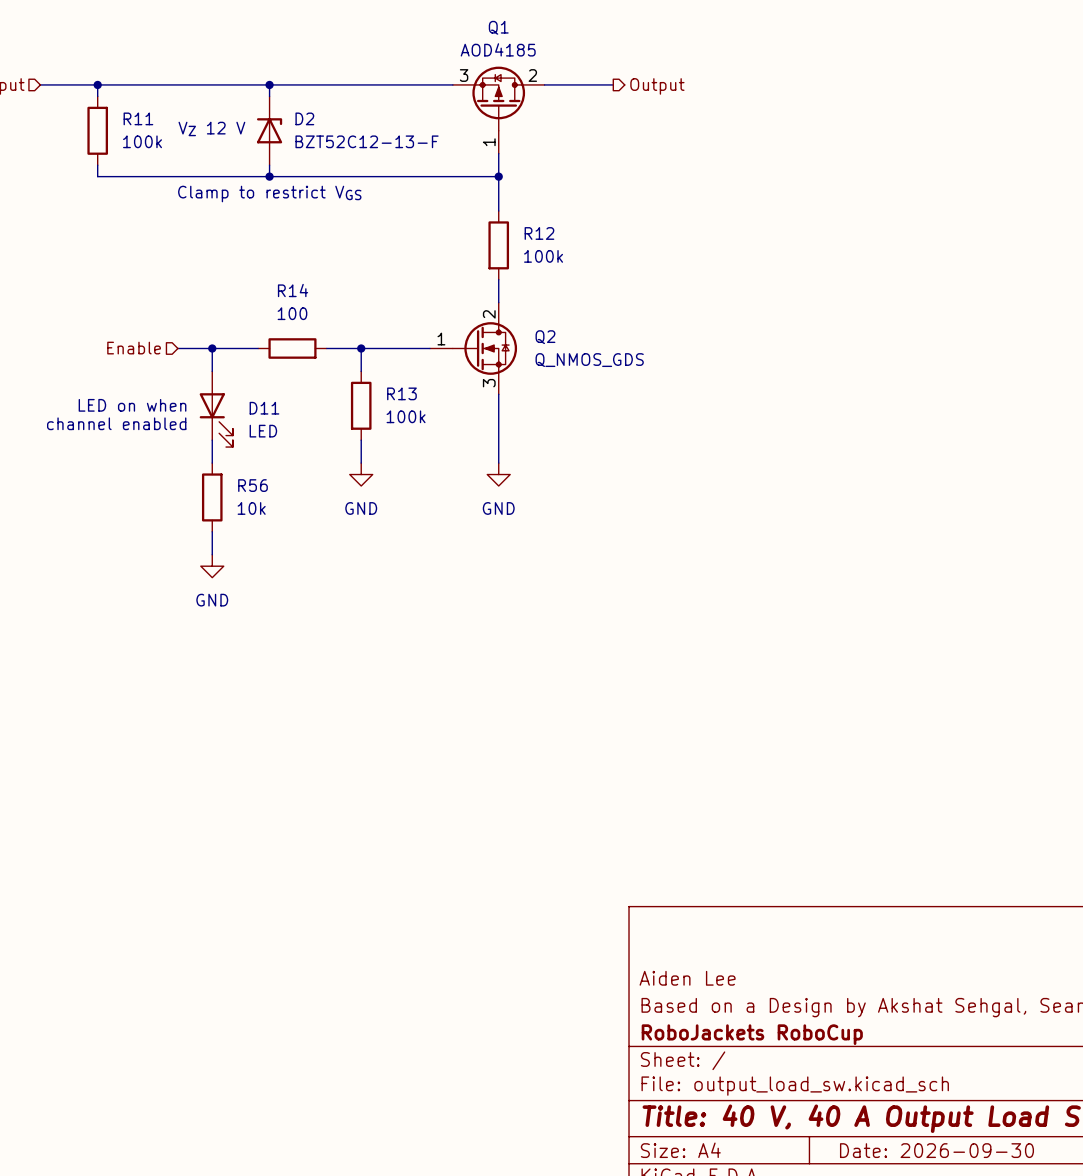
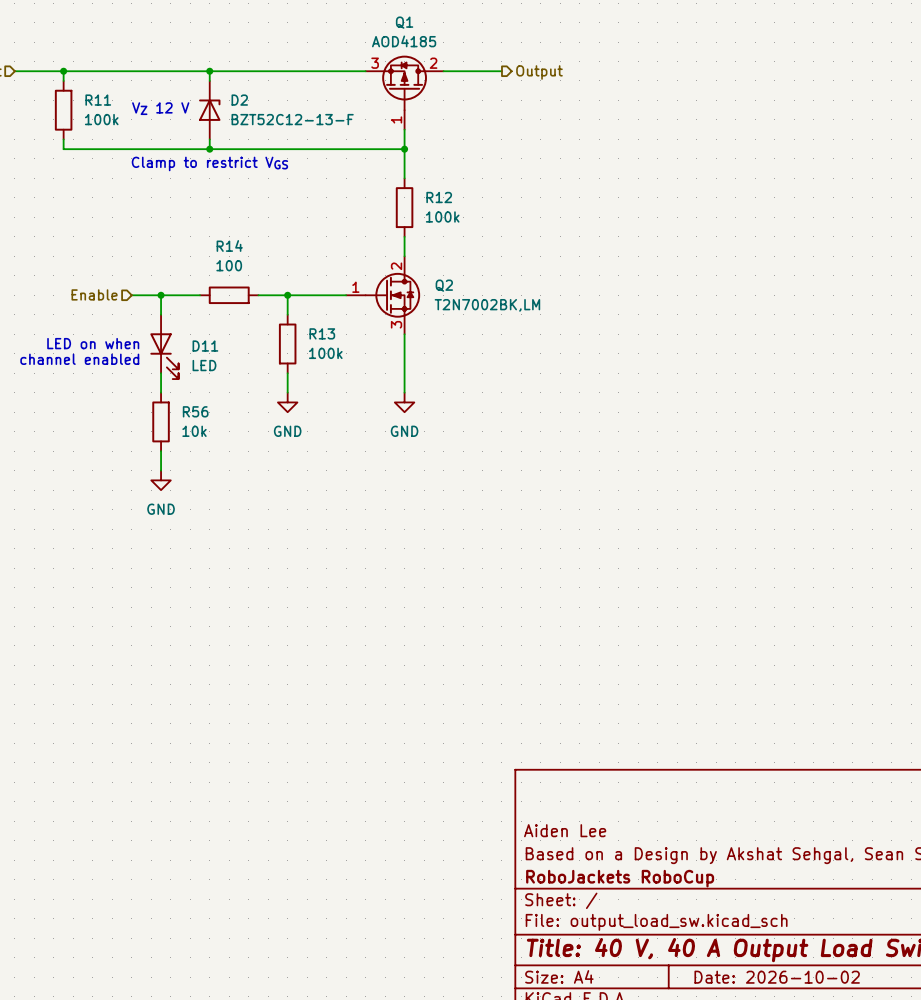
Q2 value: Q_NMOS_GDS (589, 360) -> T2N7002BK,LM (487, 305)
title block: Date: 2026-09-30 (936, 1150) -> Date: 2026-10-02 (777, 977)

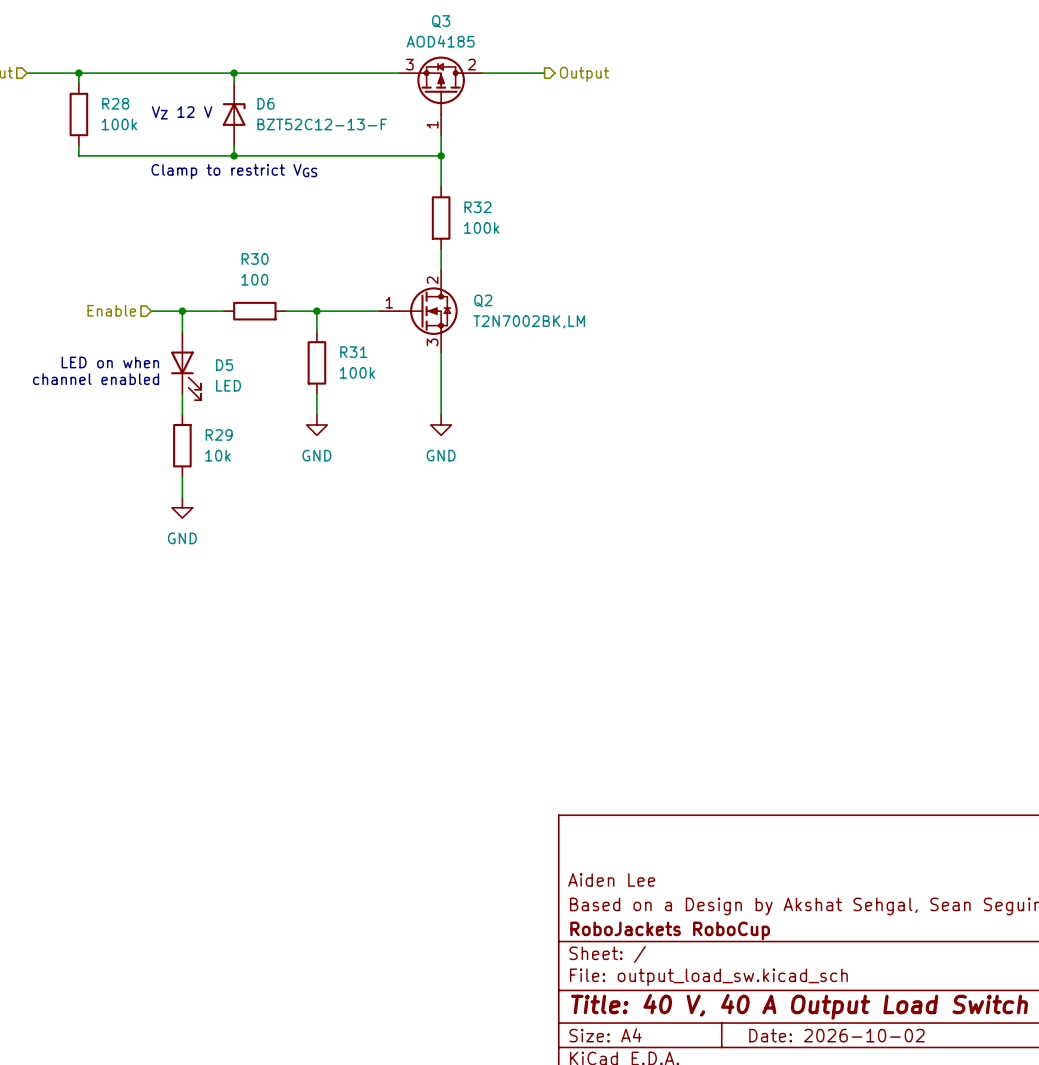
Q1 name: Q1 (404, 22) -> Q3 (441, 21)
R11 name: R11 (98, 100) -> R28 (115, 103)
D2 name: D2 (239, 100) -> D6 (266, 103)
R12 name: R12 (439, 197) -> R32 (477, 207)
R14 name: R14 (229, 245) -> R30 (255, 259)
R13 name: R13 (322, 333) -> R31 (353, 352)
D11 name: D11 (205, 346) -> D5 (224, 365)
R56 name: R56 (195, 411) -> R29 (219, 434)

